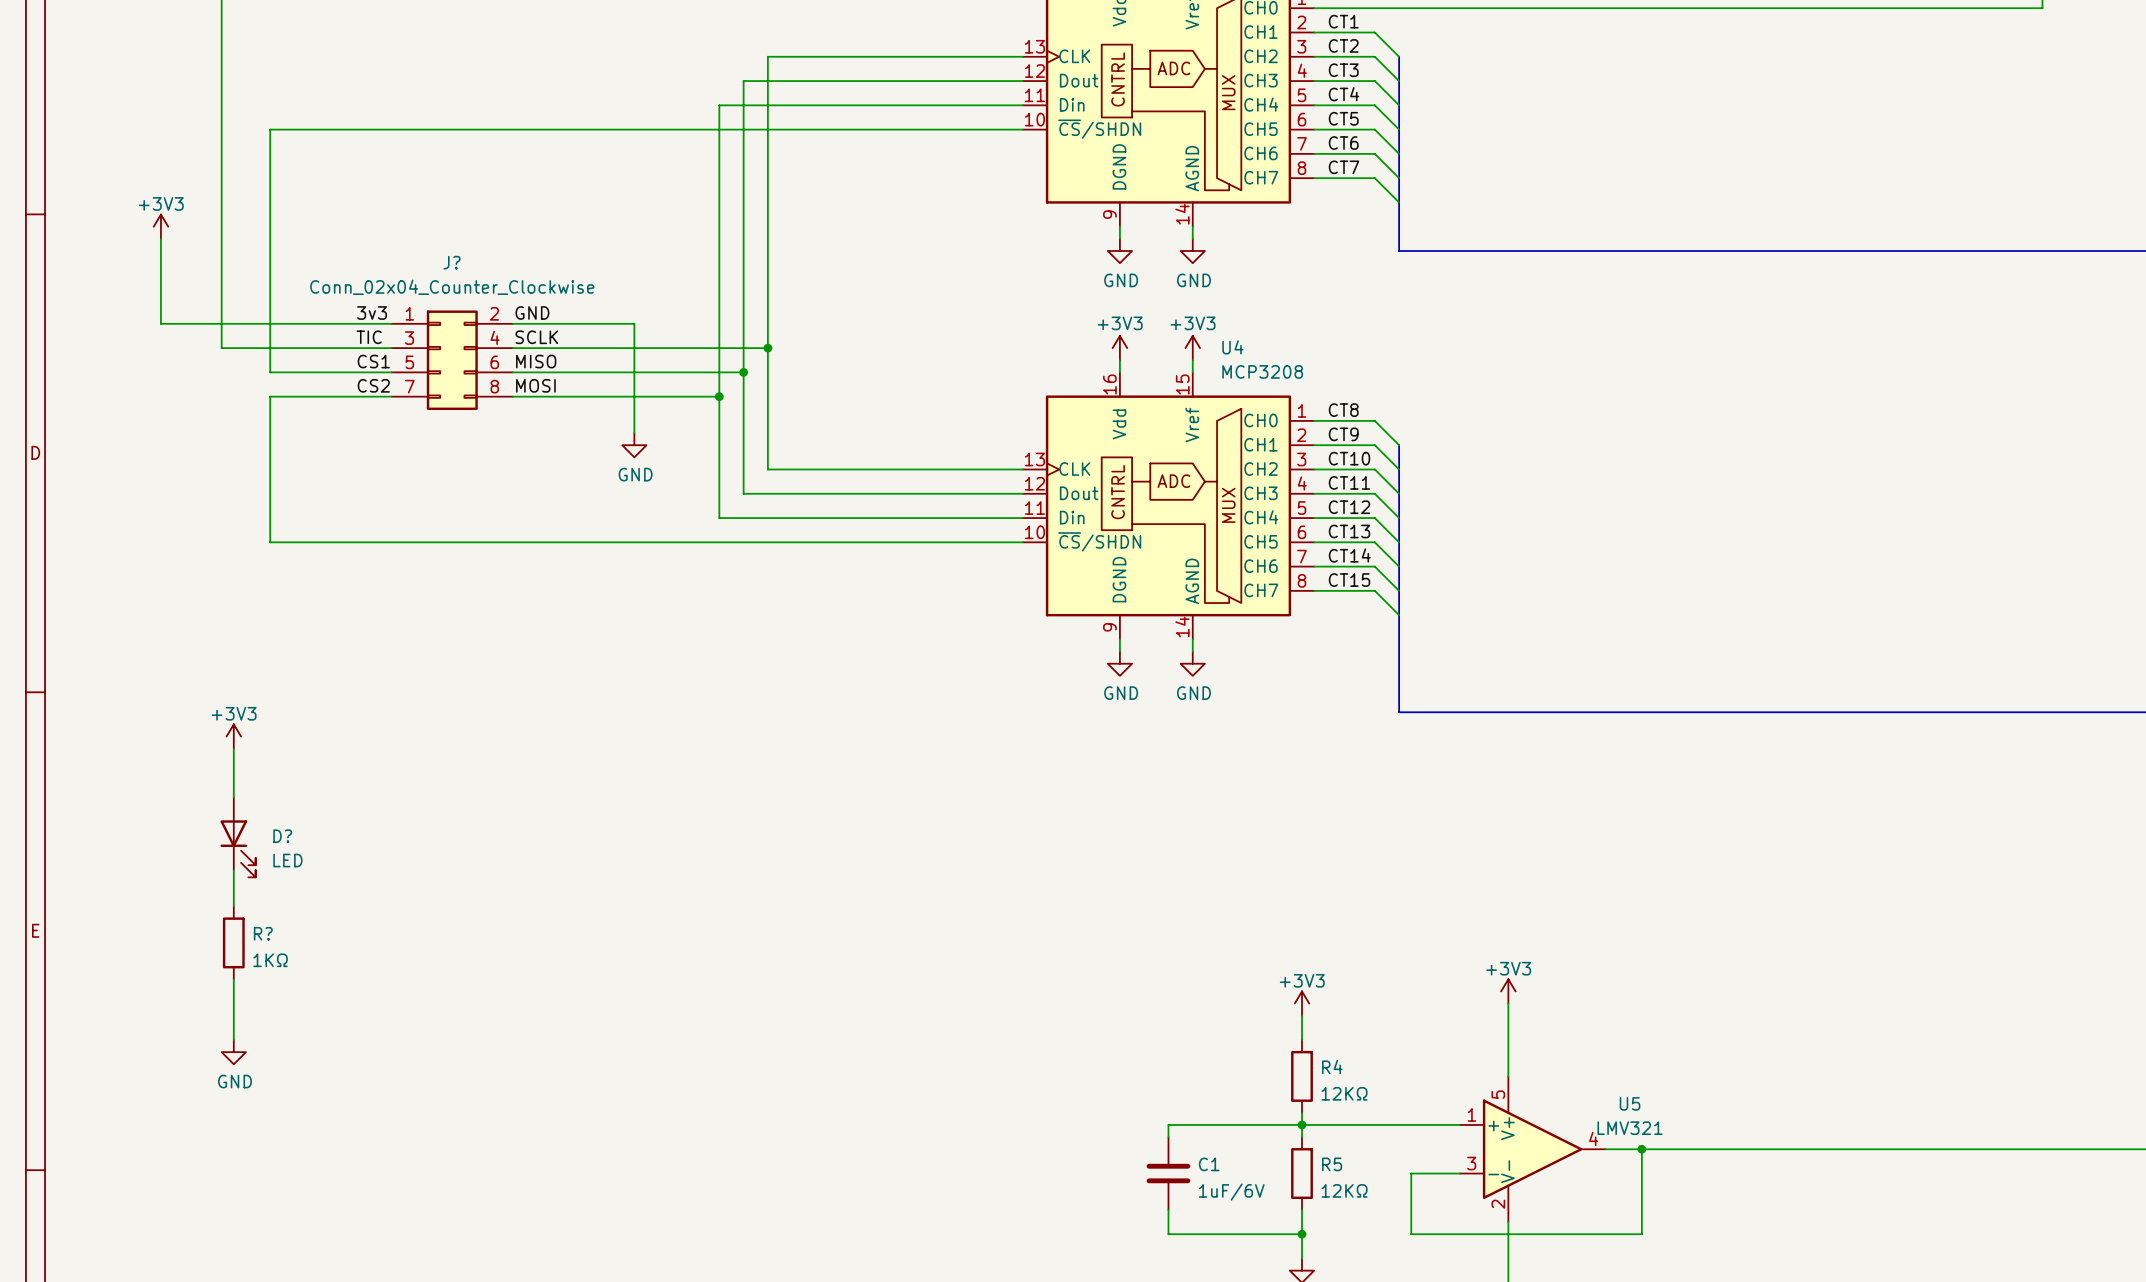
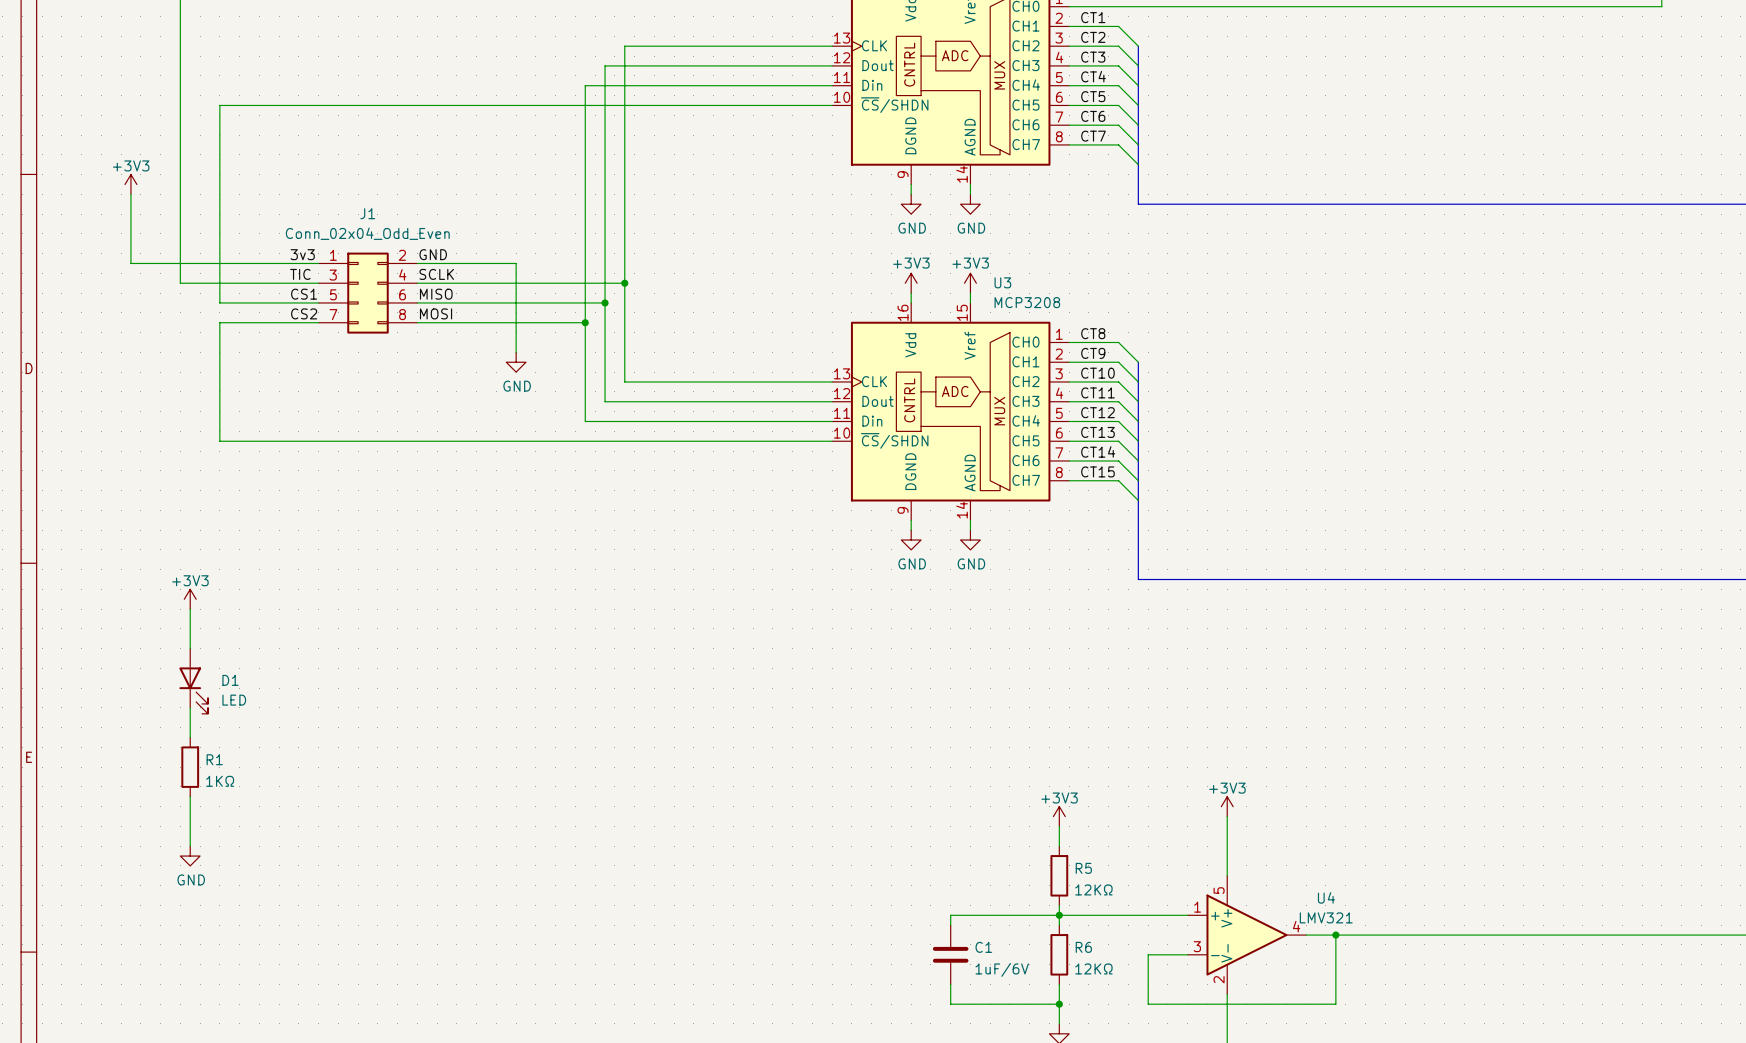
J? name: J? (452, 262) -> J1 (367, 213)
J? value: Conn_02x04_Counter_Clockwise (452, 287) -> Conn_02x04_Odd_Even (367, 233)
U4 name: U4 (1232, 347) -> U3 (1002, 282)
D? name: D? (282, 836) -> D1 (230, 680)
R? name: R? (263, 933) -> R1 (214, 759)
R4 name: R4 (1332, 1067) -> R5 (1083, 868)
U5 name: U5 (1630, 1103) -> U4 (1326, 897)
R5 name: R5 (1332, 1164) -> R6 (1083, 947)

